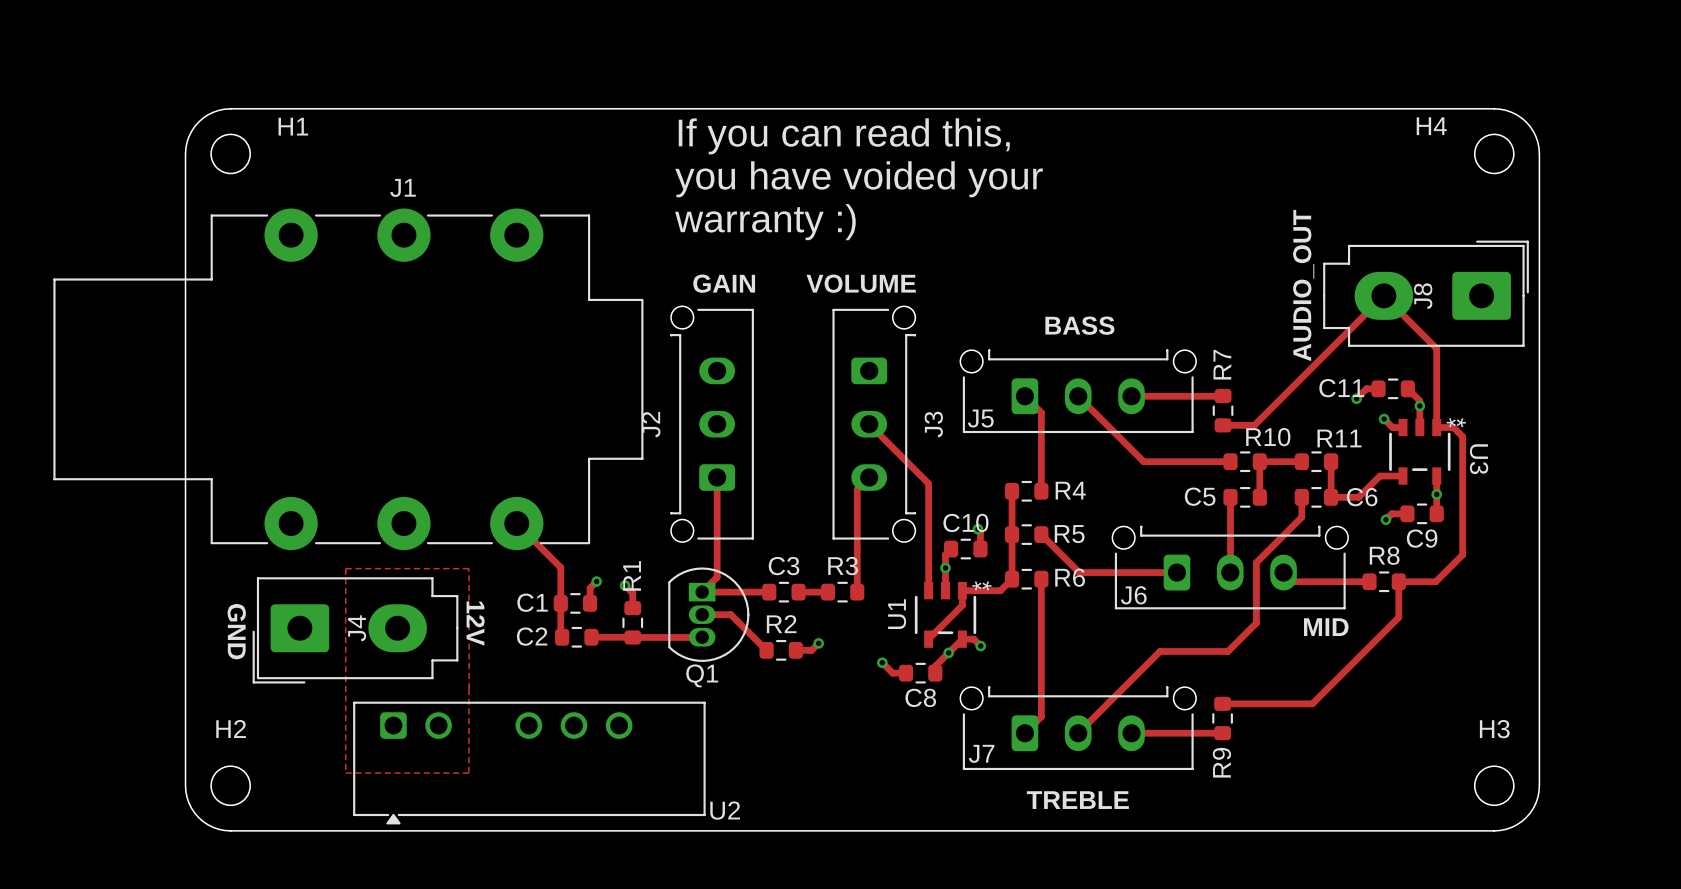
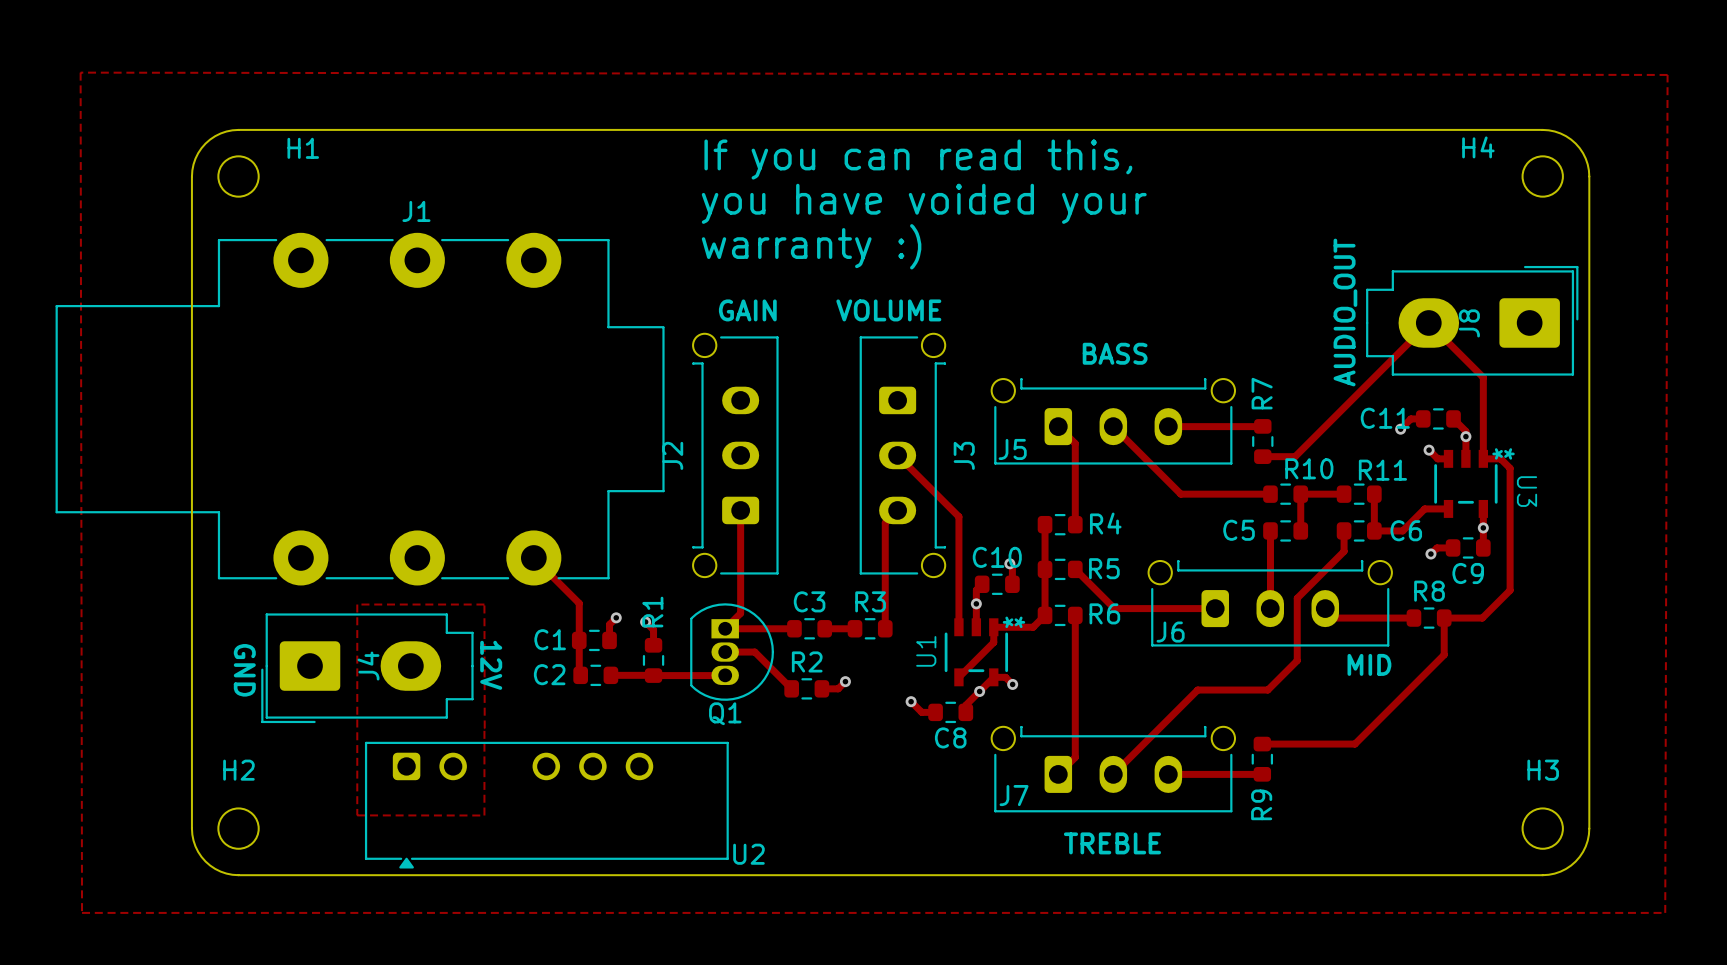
zone outline: none -> (80, 72) (82, 912) (1665, 912) (1667, 74) (80, 72)

